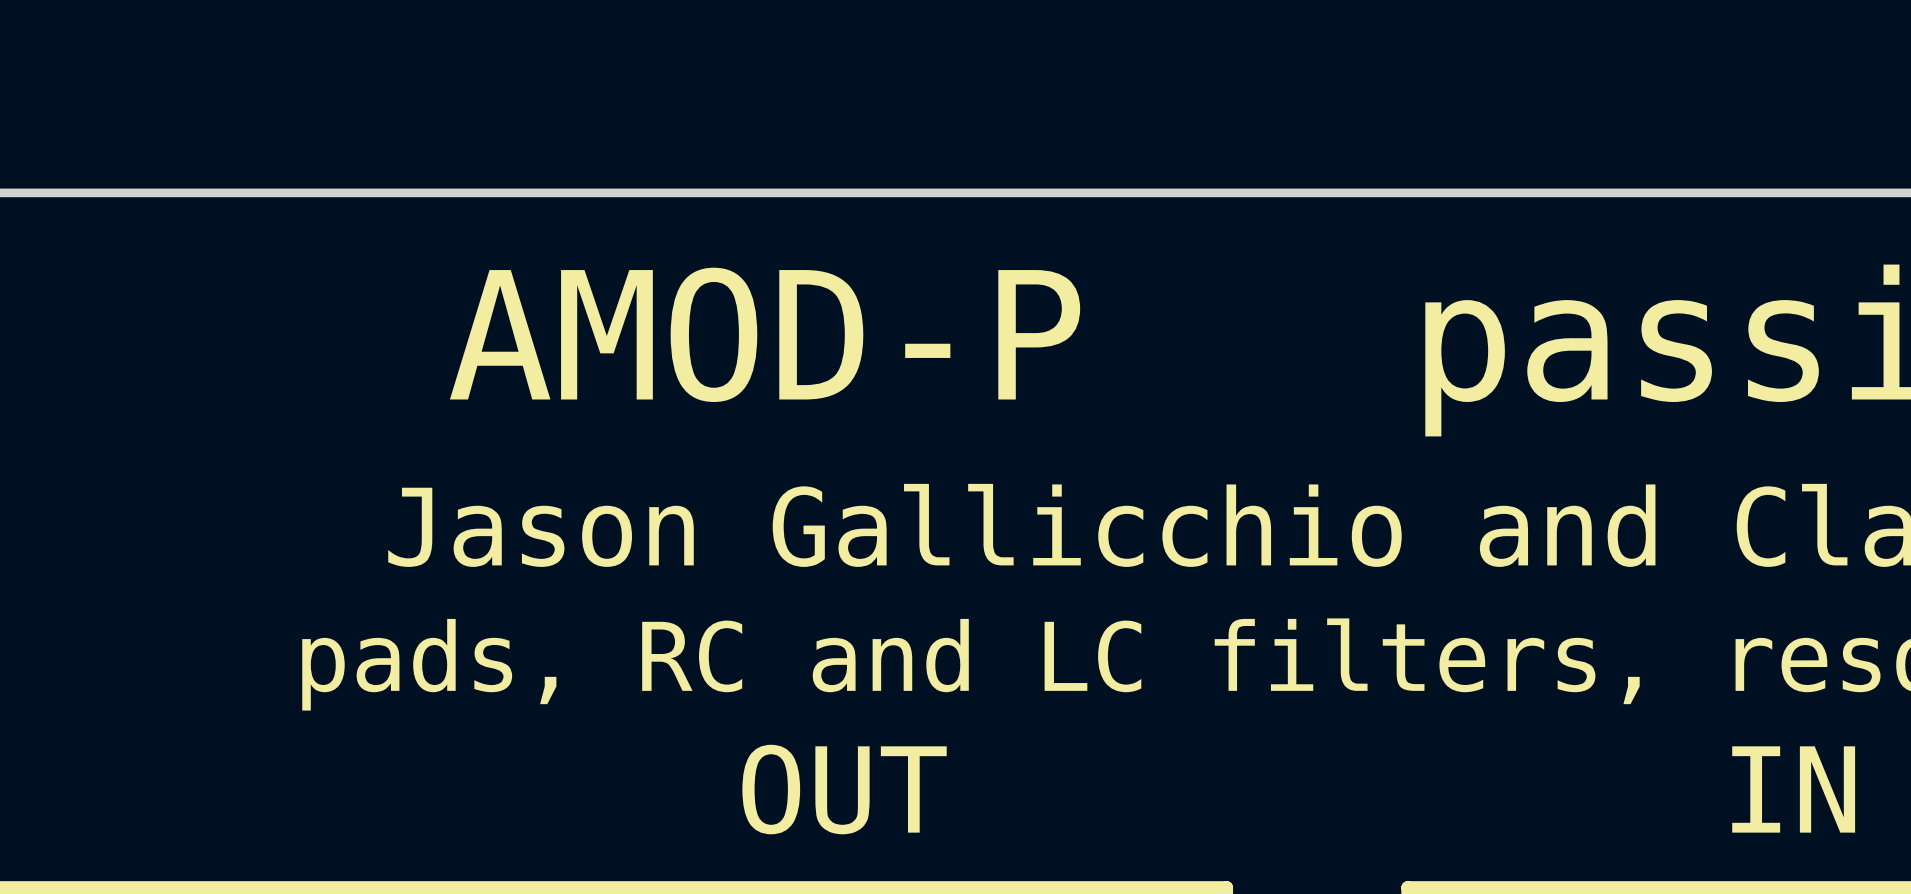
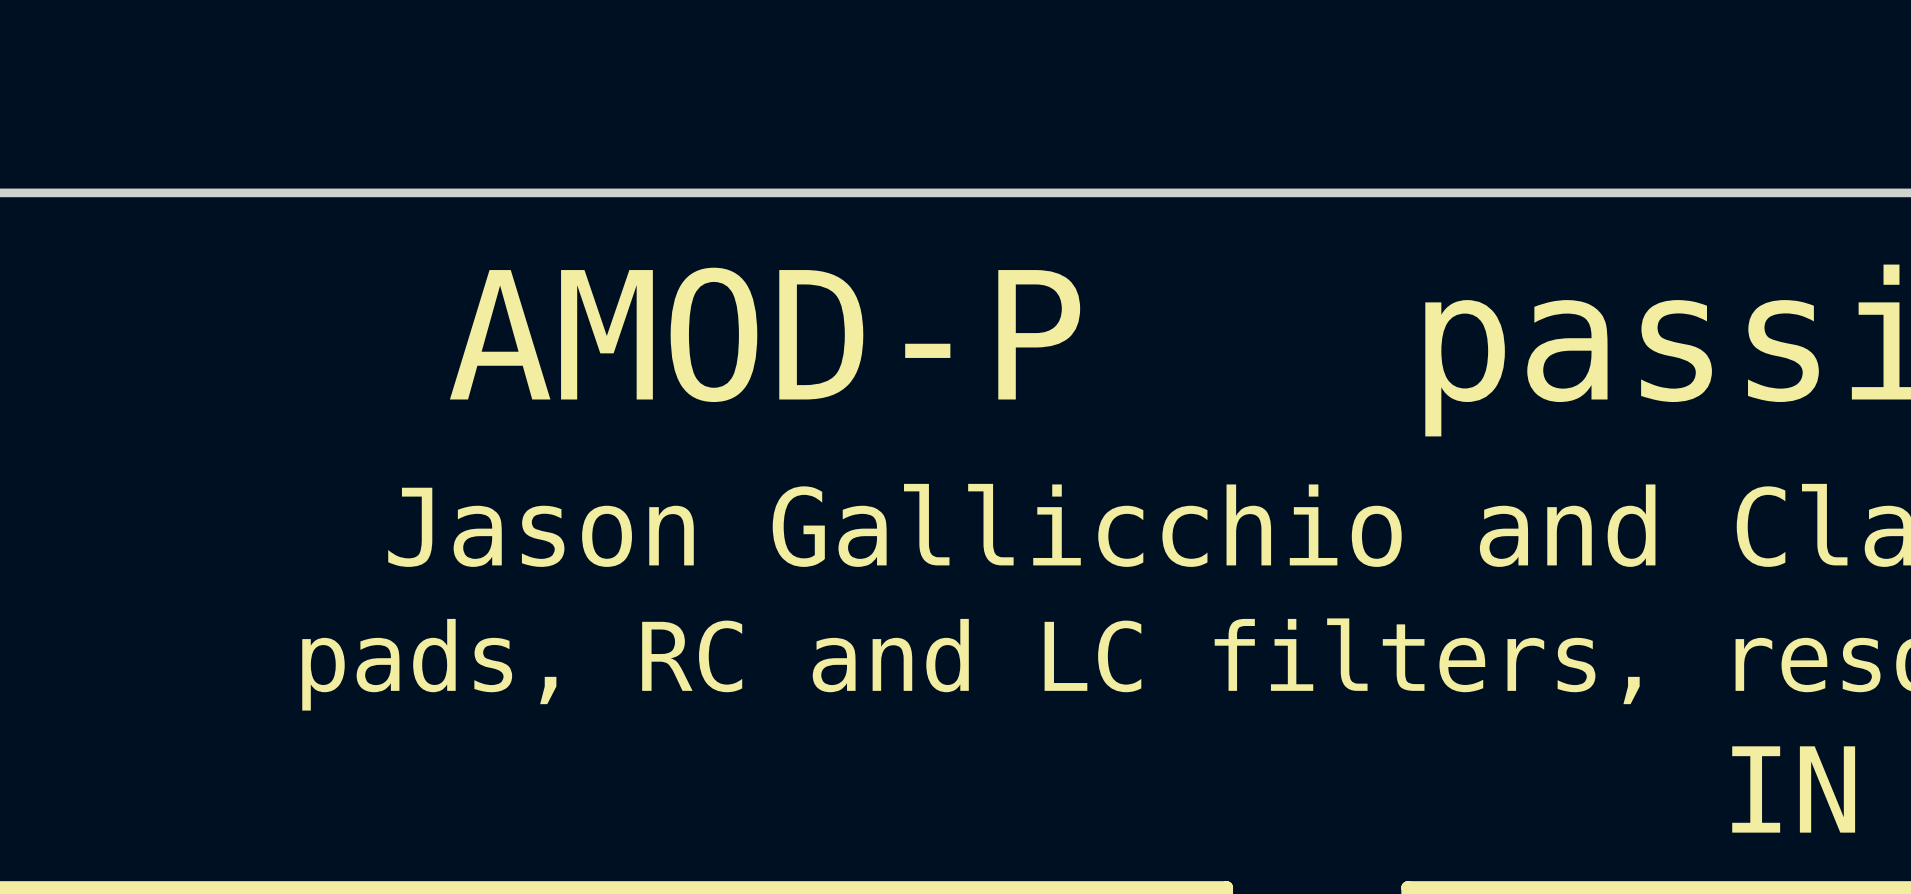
text: OUT (844, 789) -> none

